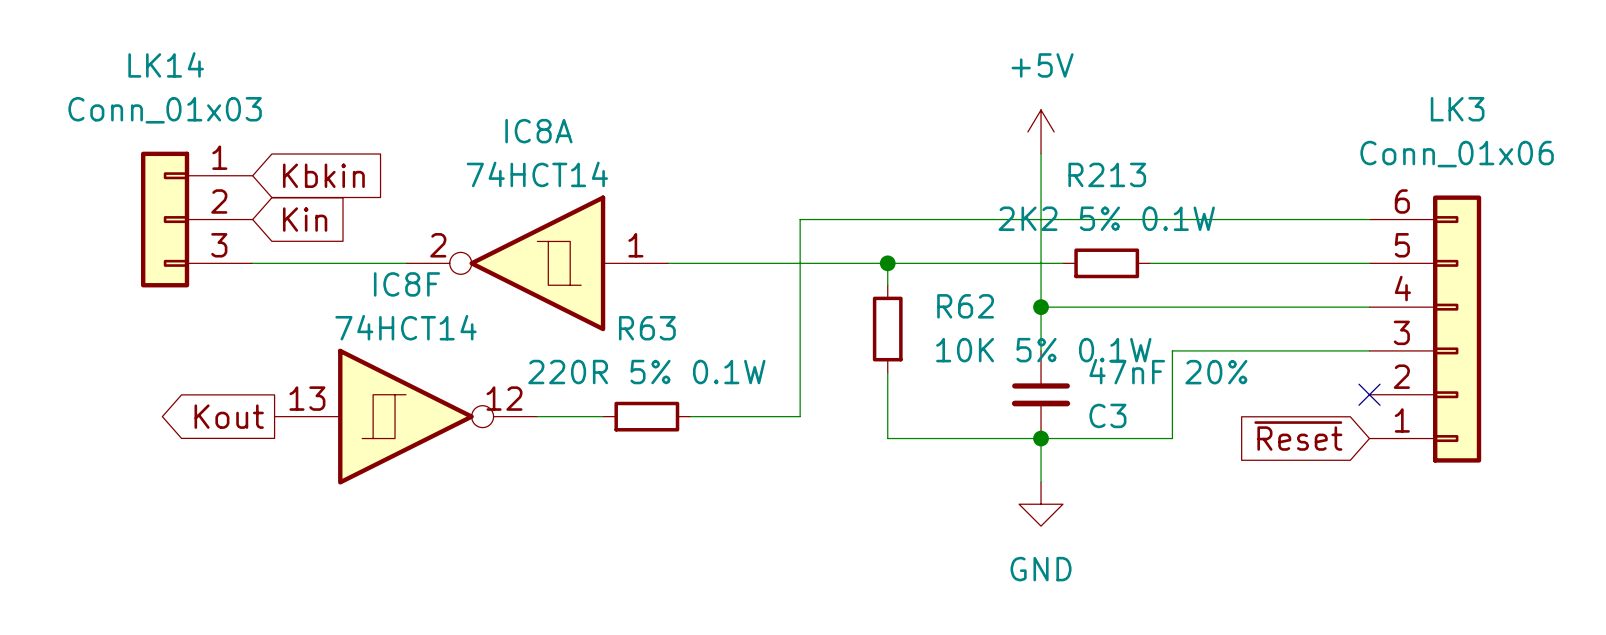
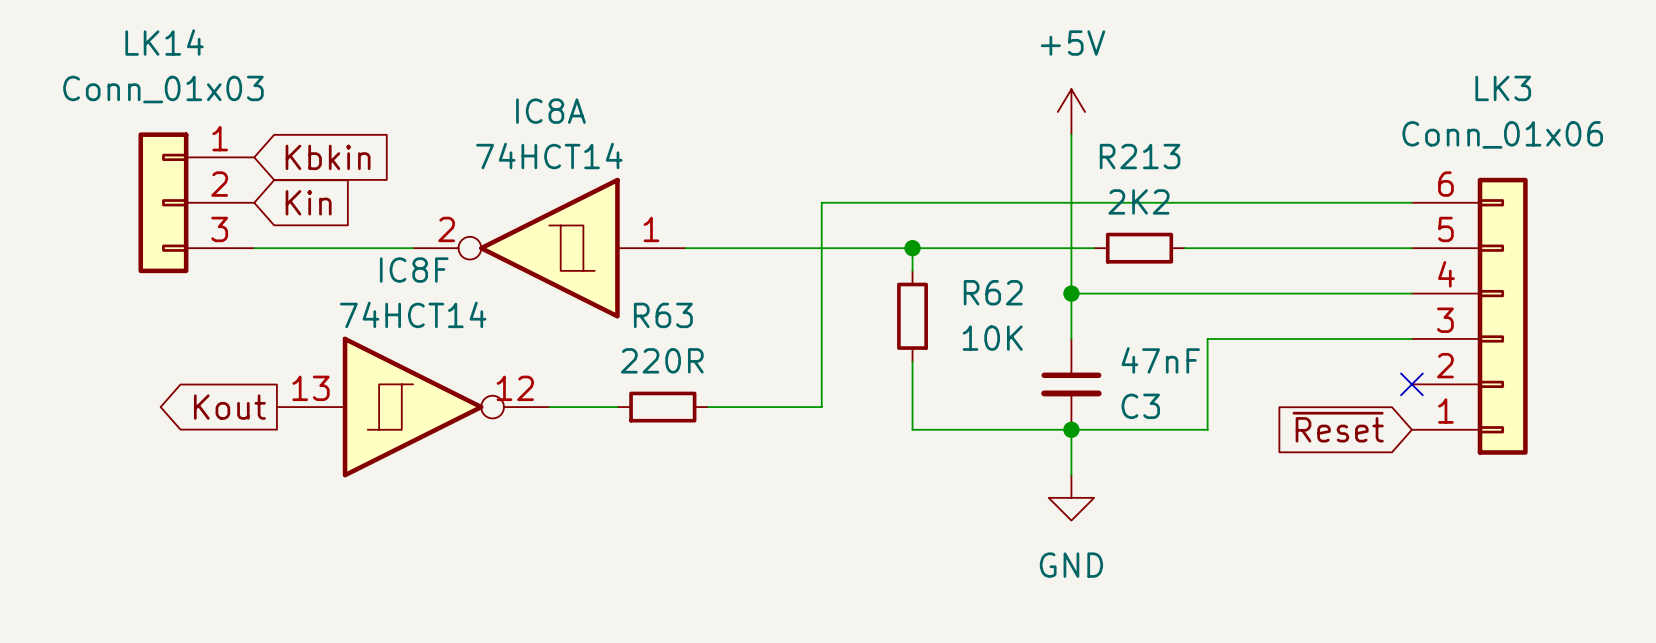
R213 value: 2K2 5% 0.1W (1106, 218) -> 2K2 (1138, 201)
R62 value: 10K 5% 0.1W (1043, 350) -> 10K (992, 338)
C3 value: 47nF 20% (1168, 371) -> 47nF (1160, 360)
R63 value: 220R 5% 0.1W (646, 372) -> 220R (662, 360)

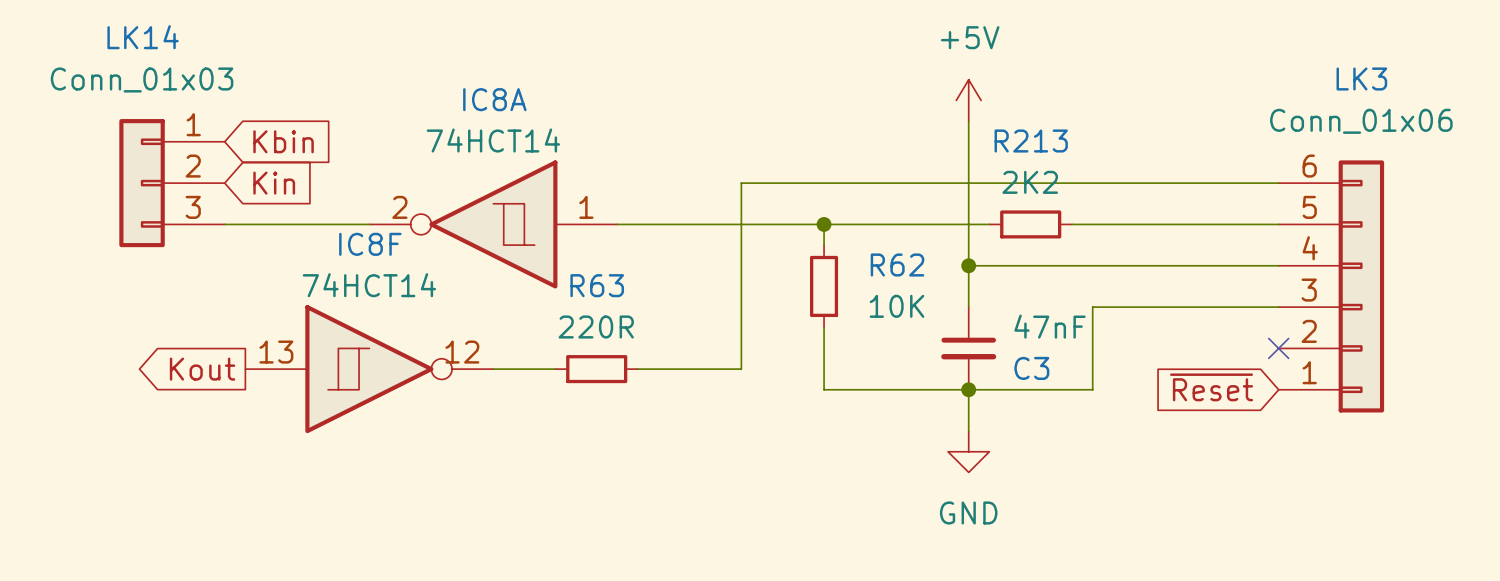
global label: Kbkin (328, 157) -> Kbin (283, 141)

